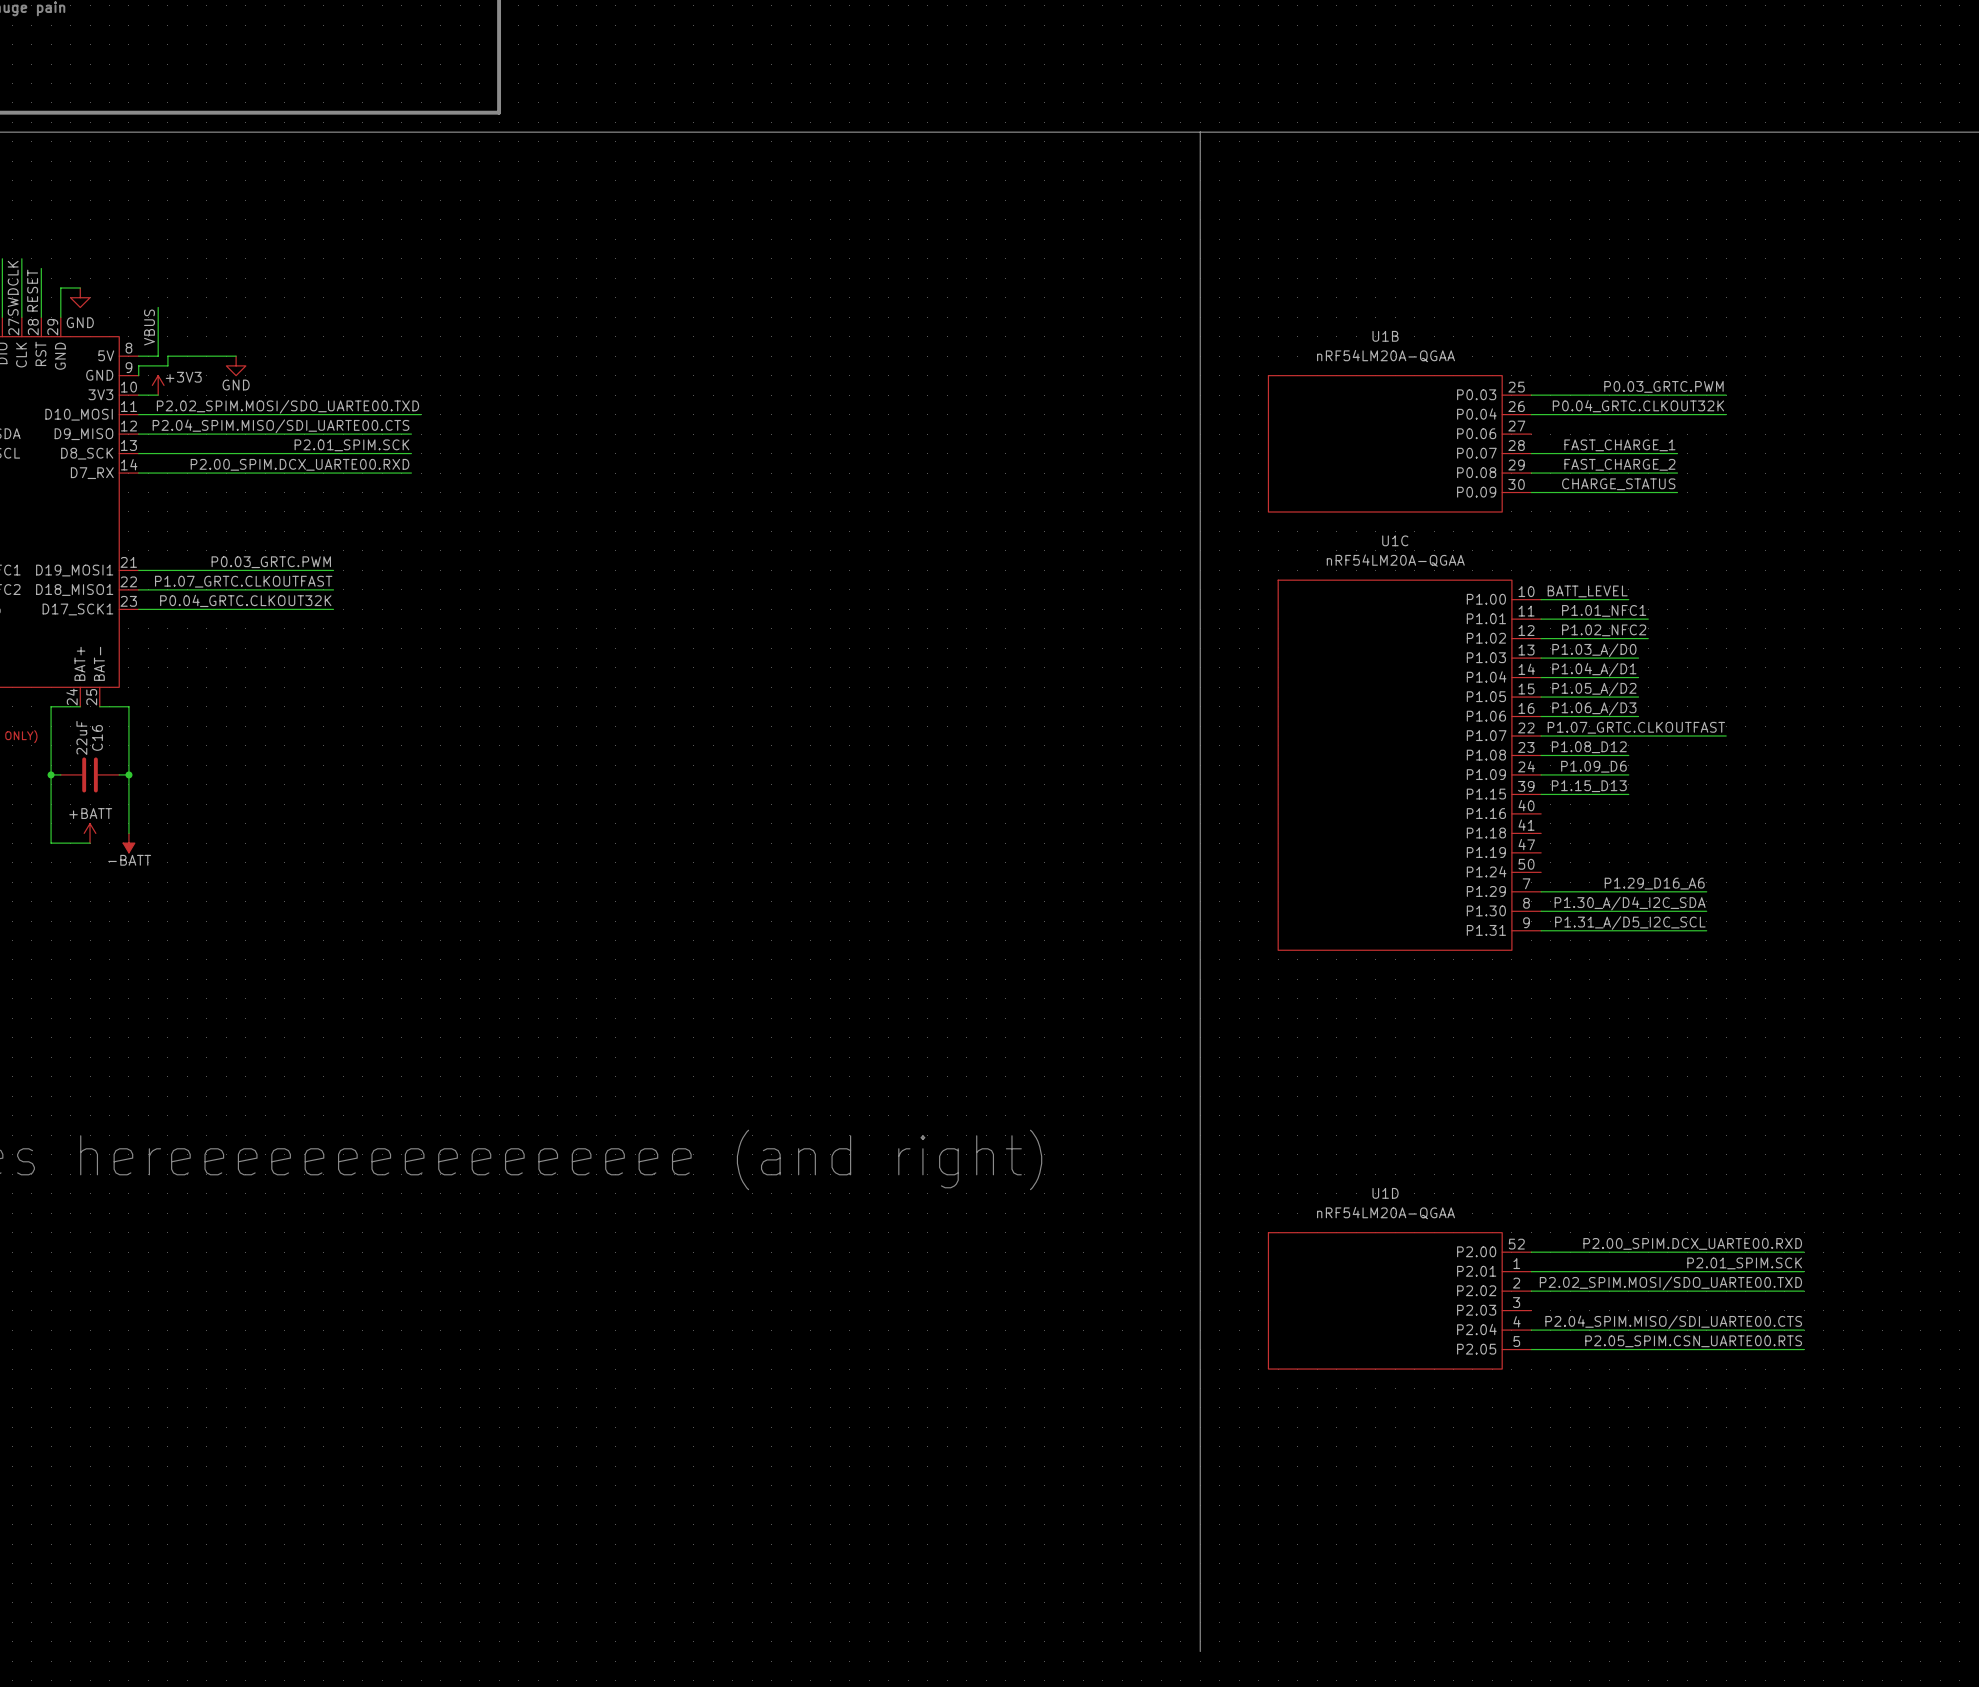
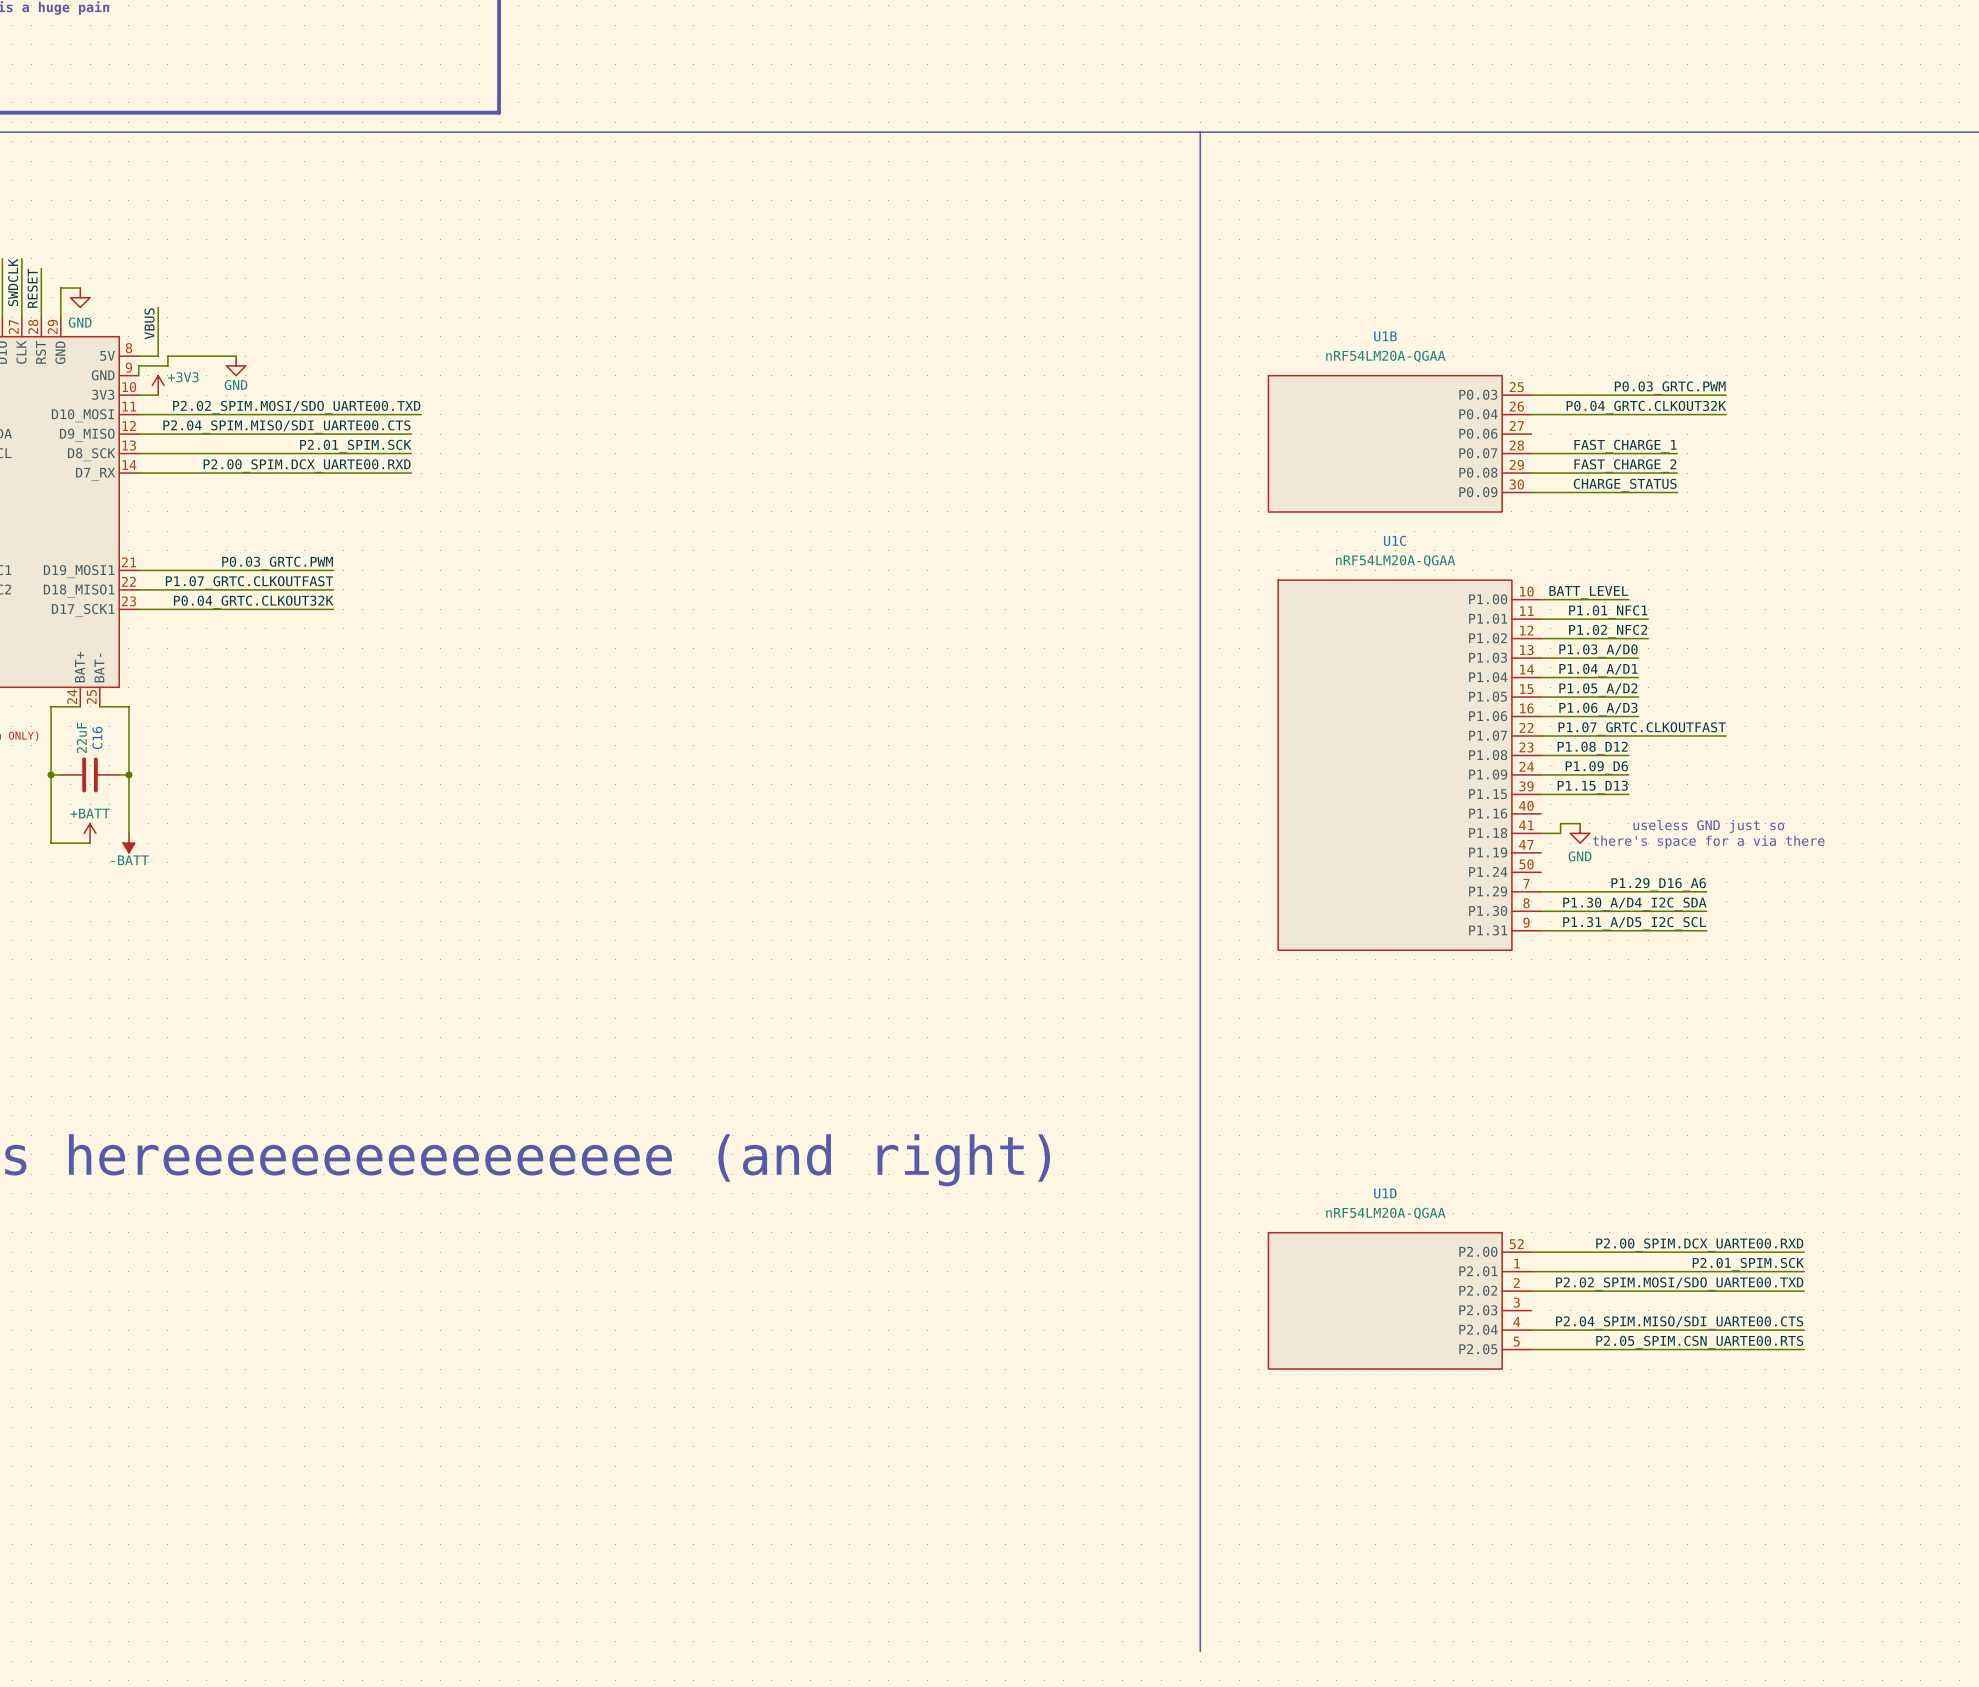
wire: none -> (1580, 823) (1560, 823) (1560, 833) (1541, 833)
text: none -> useless GND just so (1708, 826)
power symbol: none -> GND (1580, 833)
text: none -> there's space for a via there (1708, 842)

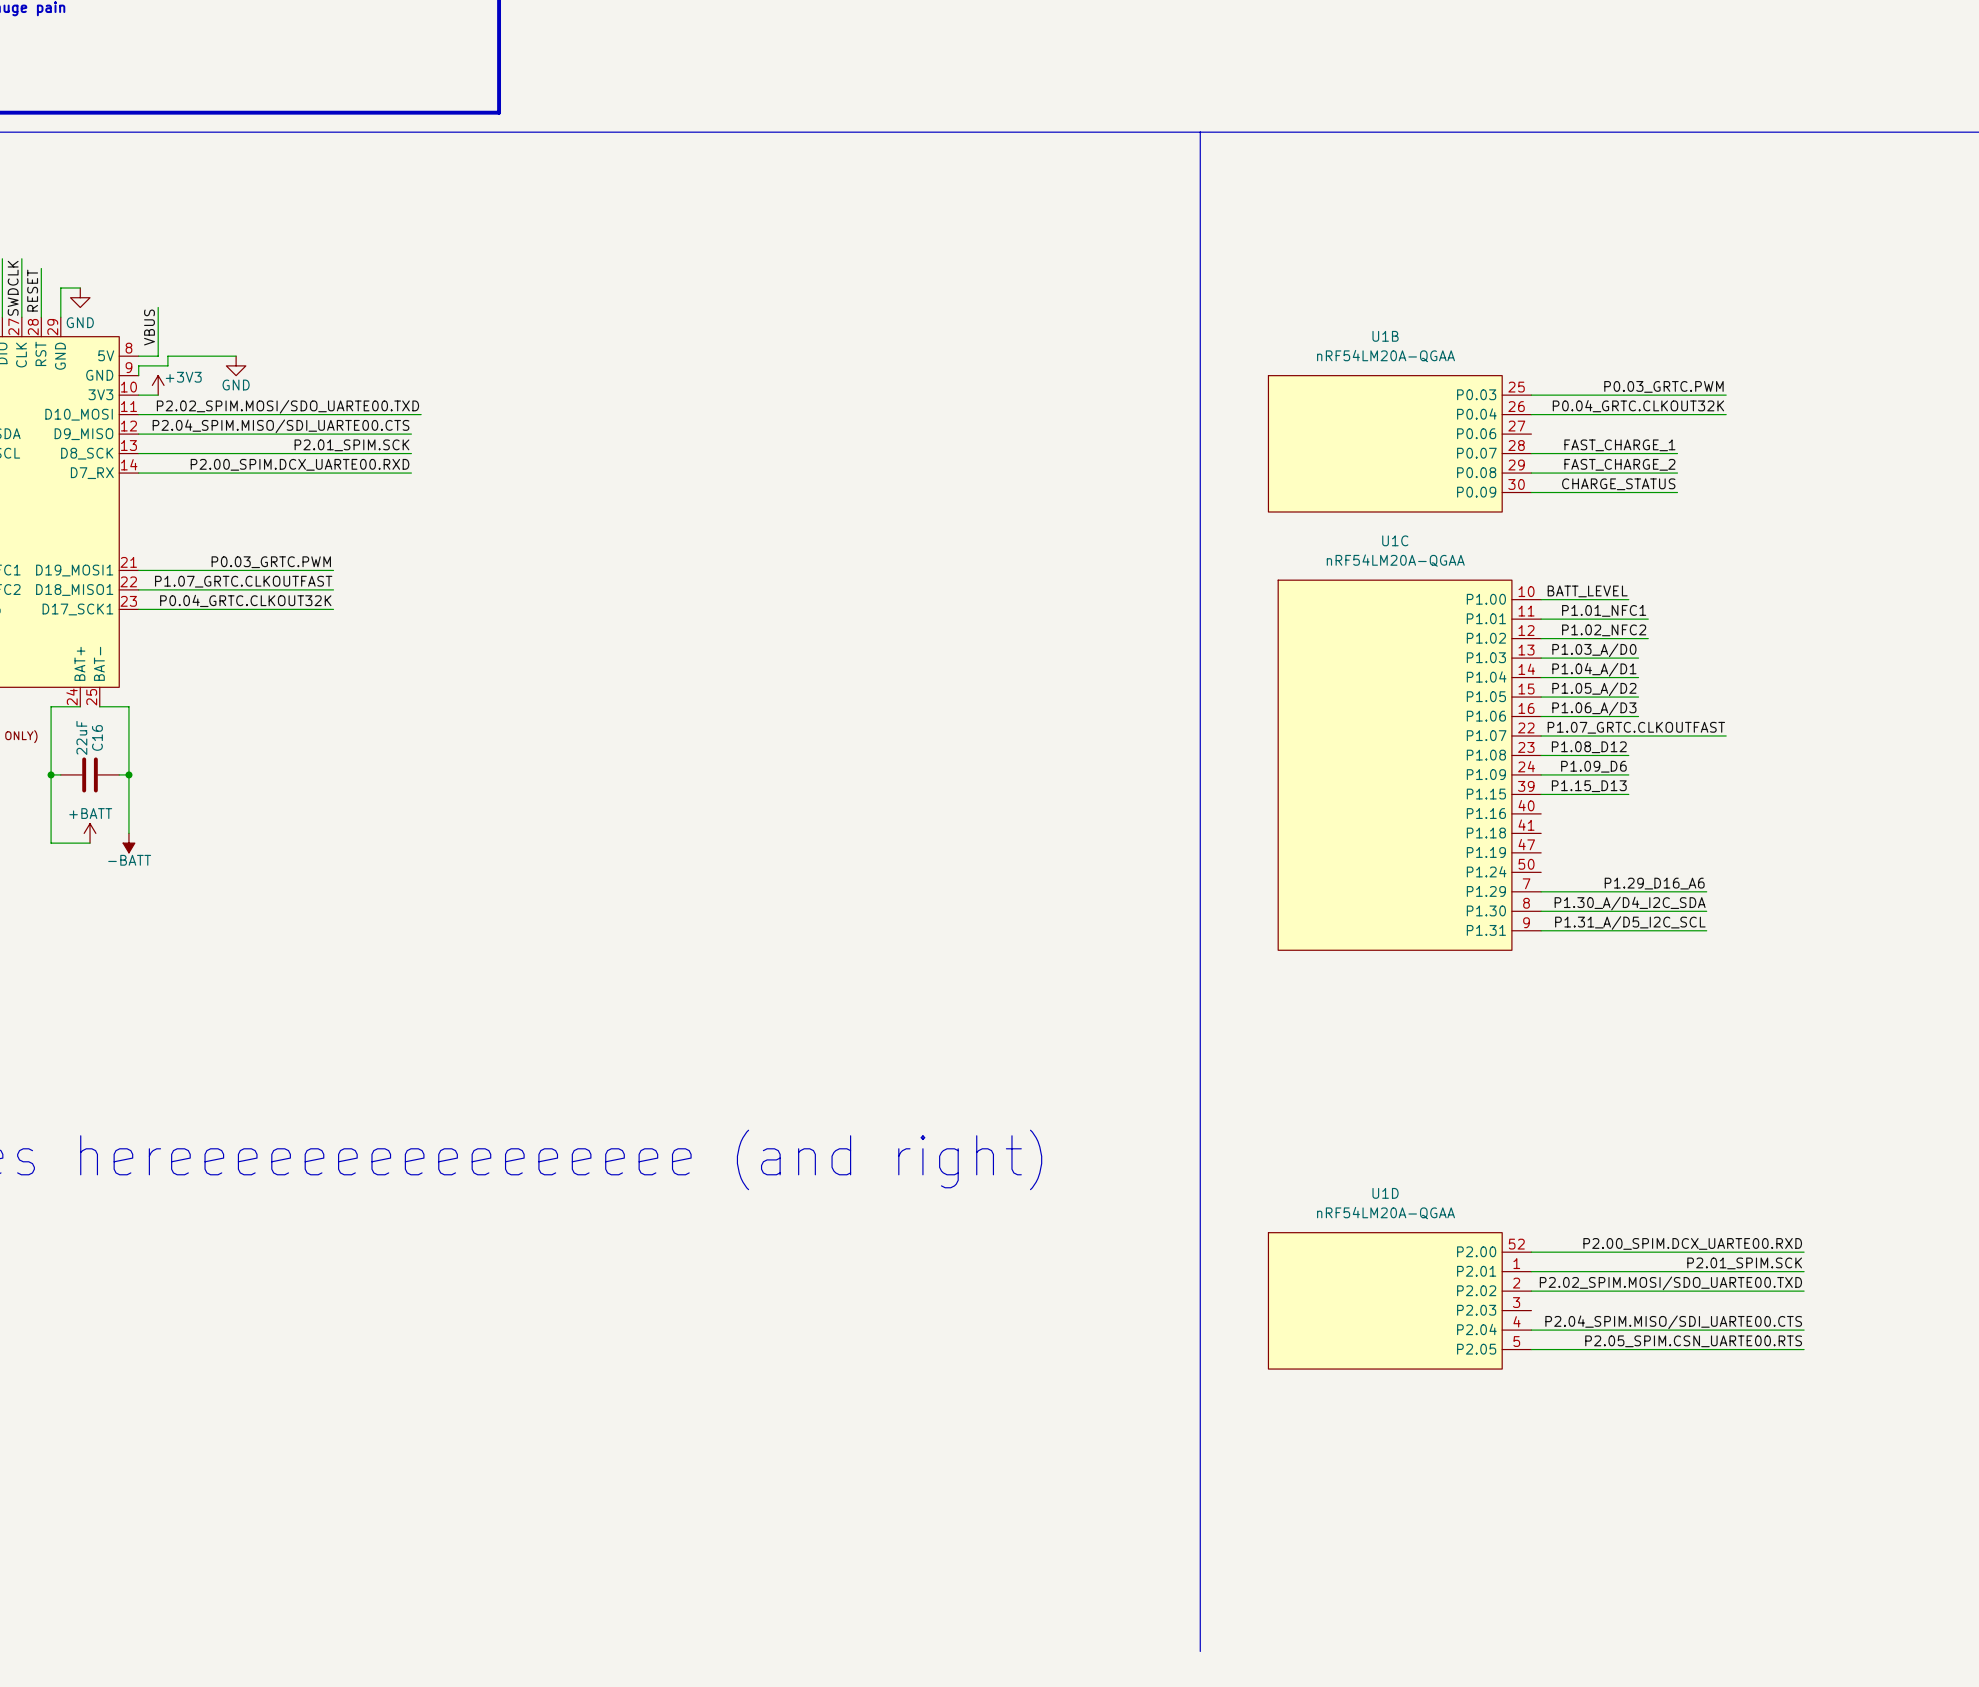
wire: (1580, 823) (1560, 823) (1560, 833) (1541, 833) -> none
text: useless GND just so (1708, 826) -> none
power symbol: GND (1580, 833) -> none
text: there's space for a via there (1708, 842) -> none

